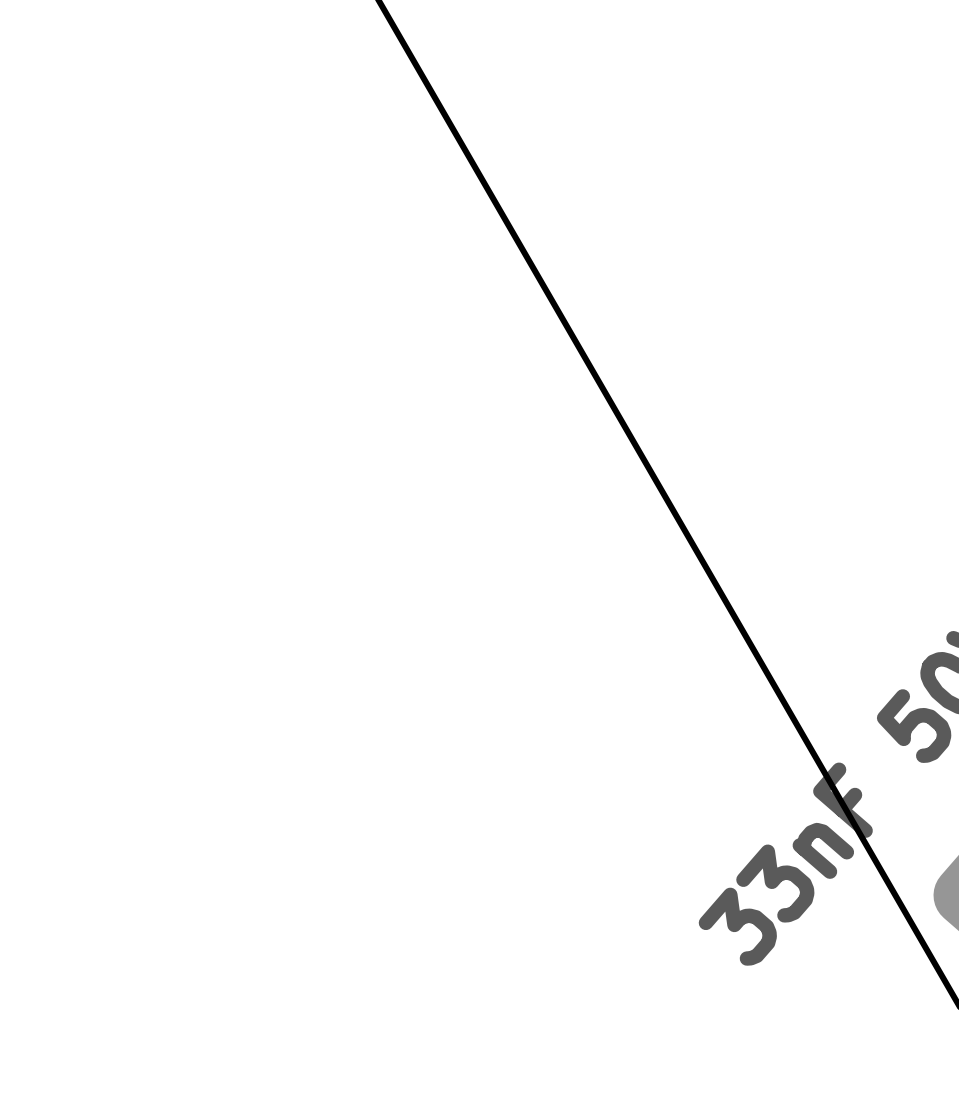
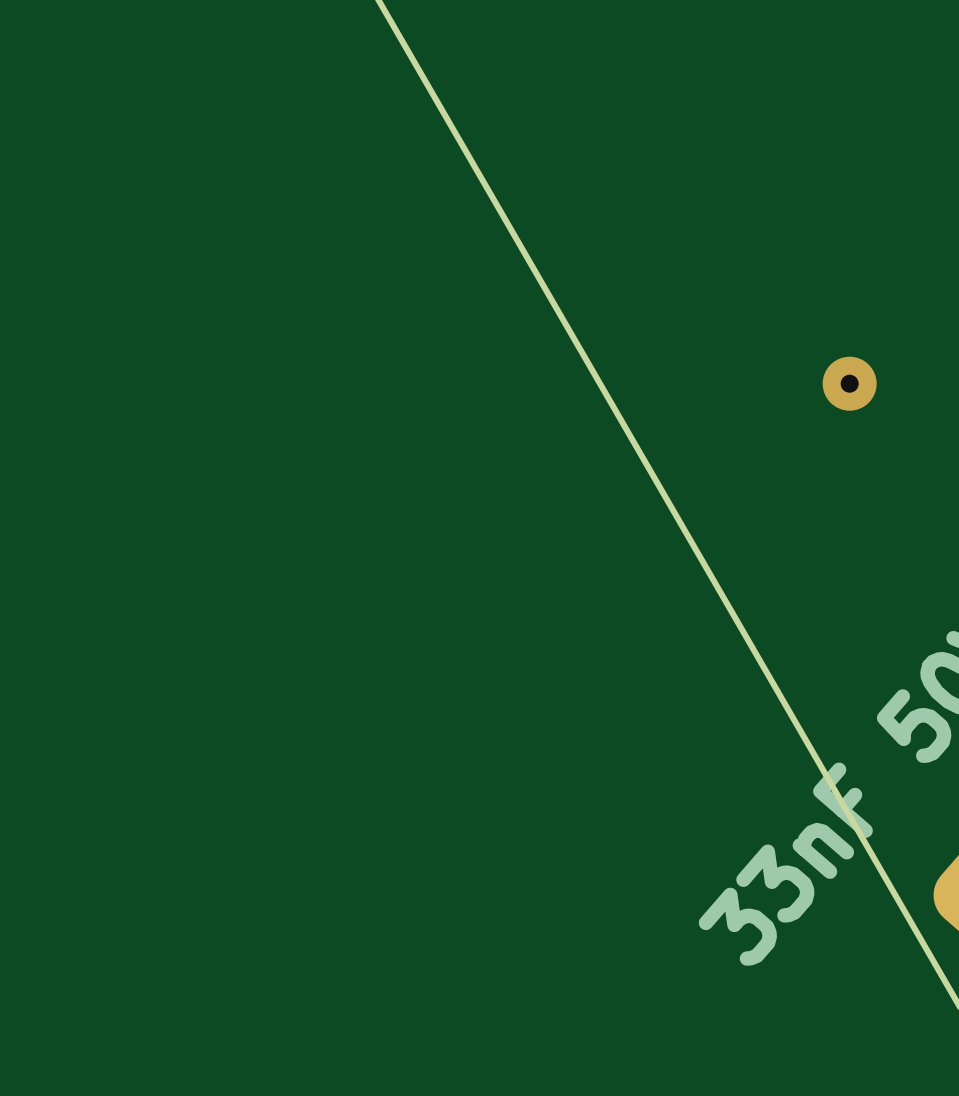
via: none -> (849, 383)

